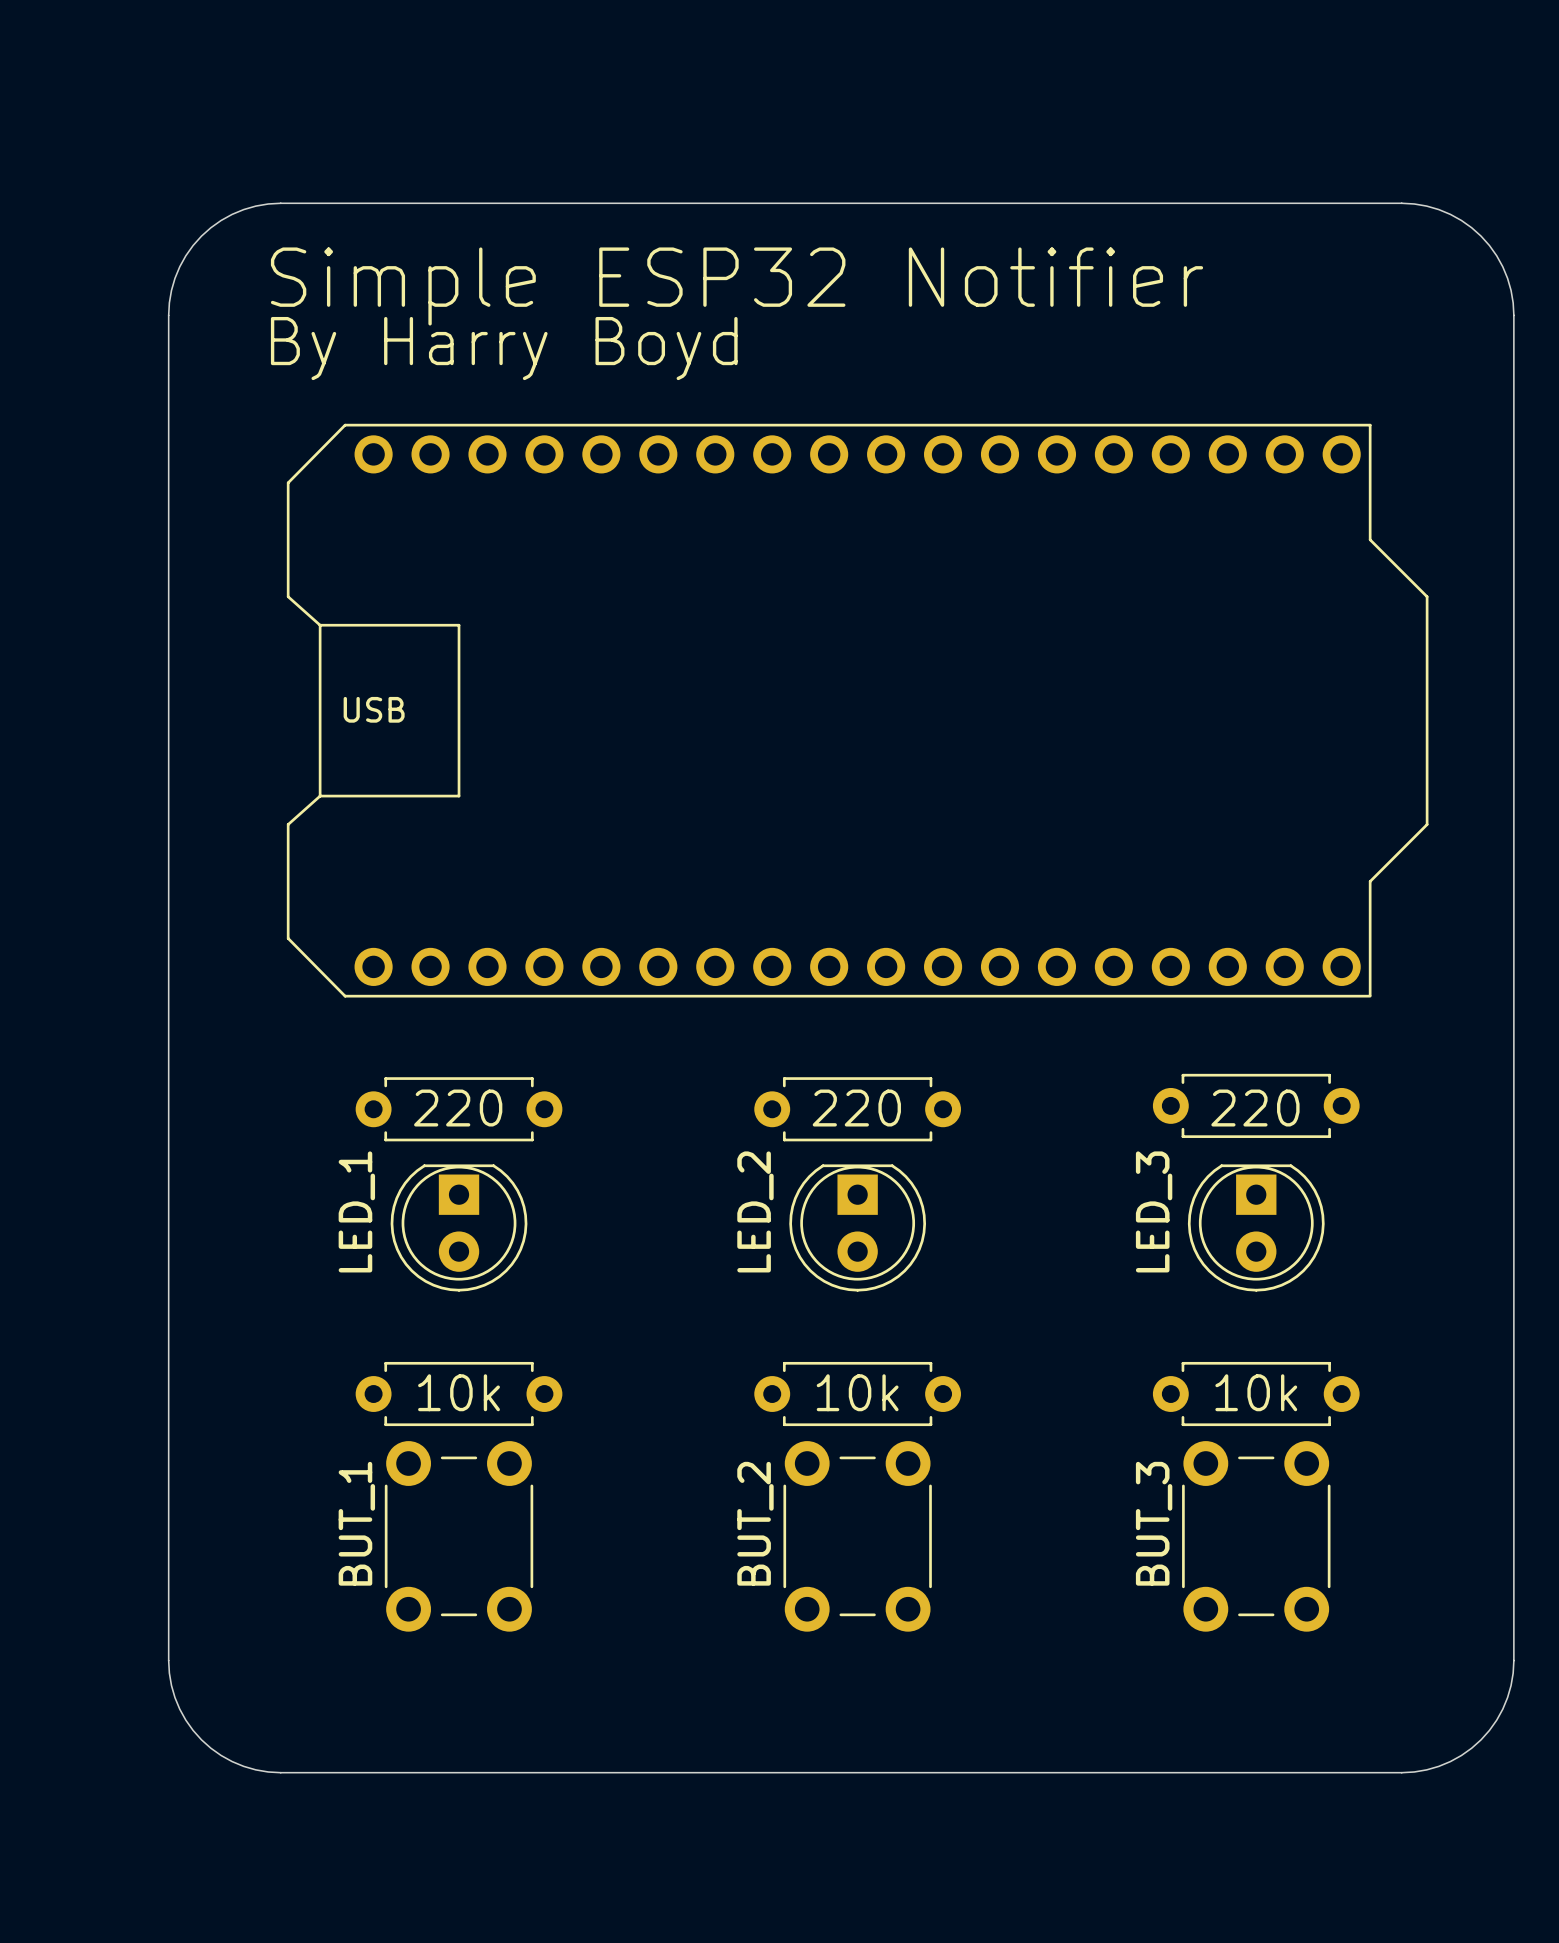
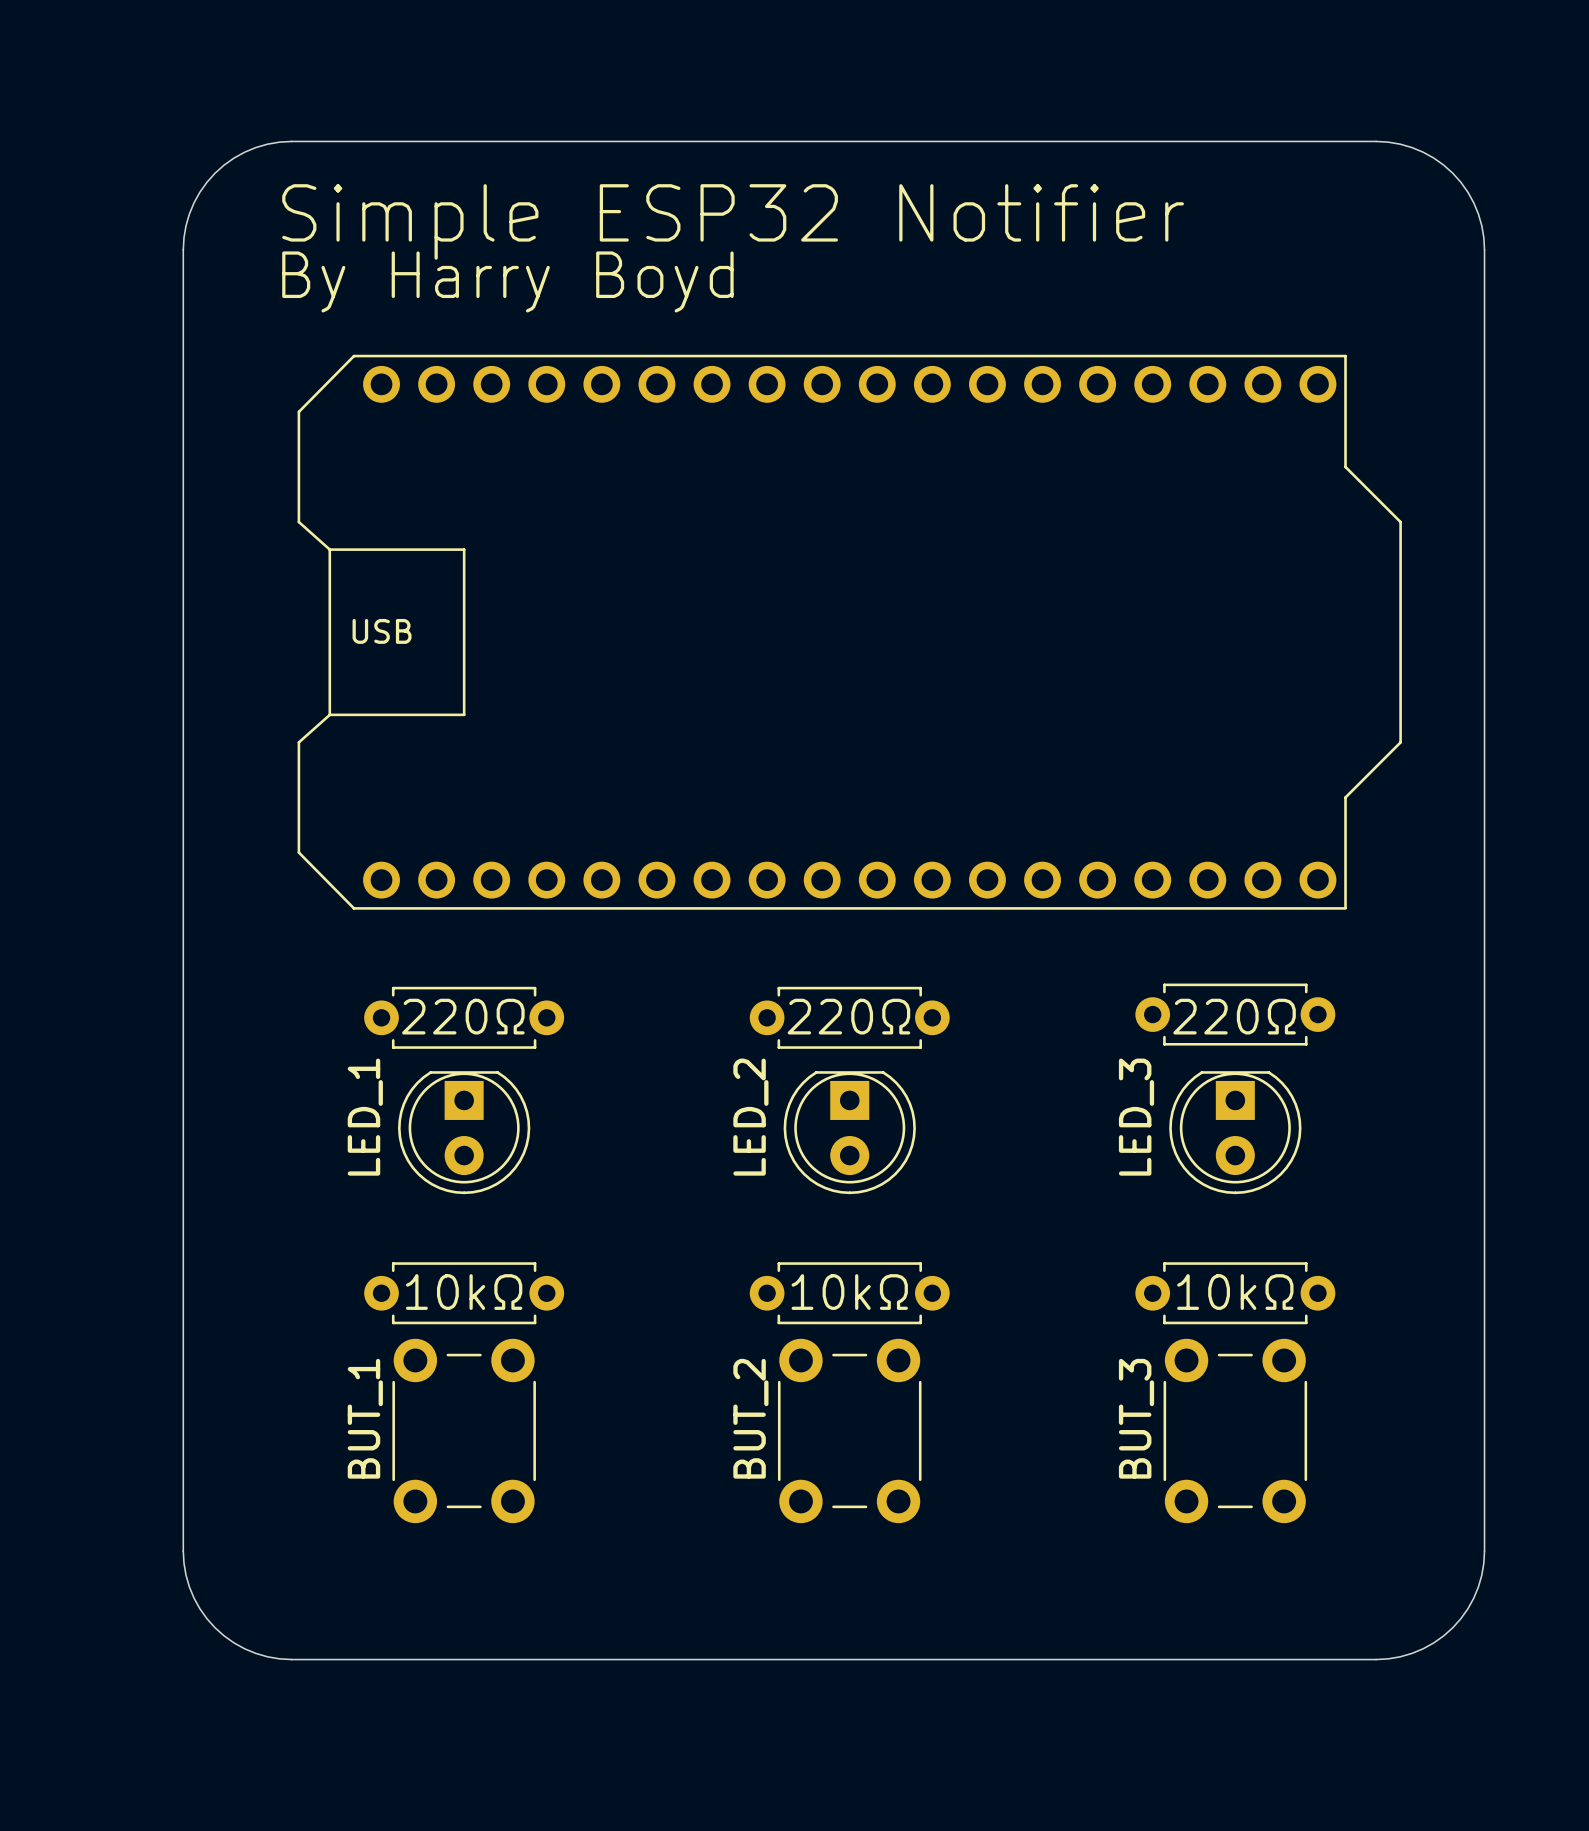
part value: 220 (458, 1108) -> 220Ω (463, 1016)
part value: 220 (856, 1108) -> 220Ω (848, 1016)
part value: 220 (1255, 1108) -> 220Ω (1234, 1016)
part value: 10k (459, 1392) -> 10kΩ (464, 1292)
part value: 10k (857, 1392) -> 10kΩ (849, 1292)
part value: 10k (1256, 1392) -> 10kΩ (1235, 1292)

